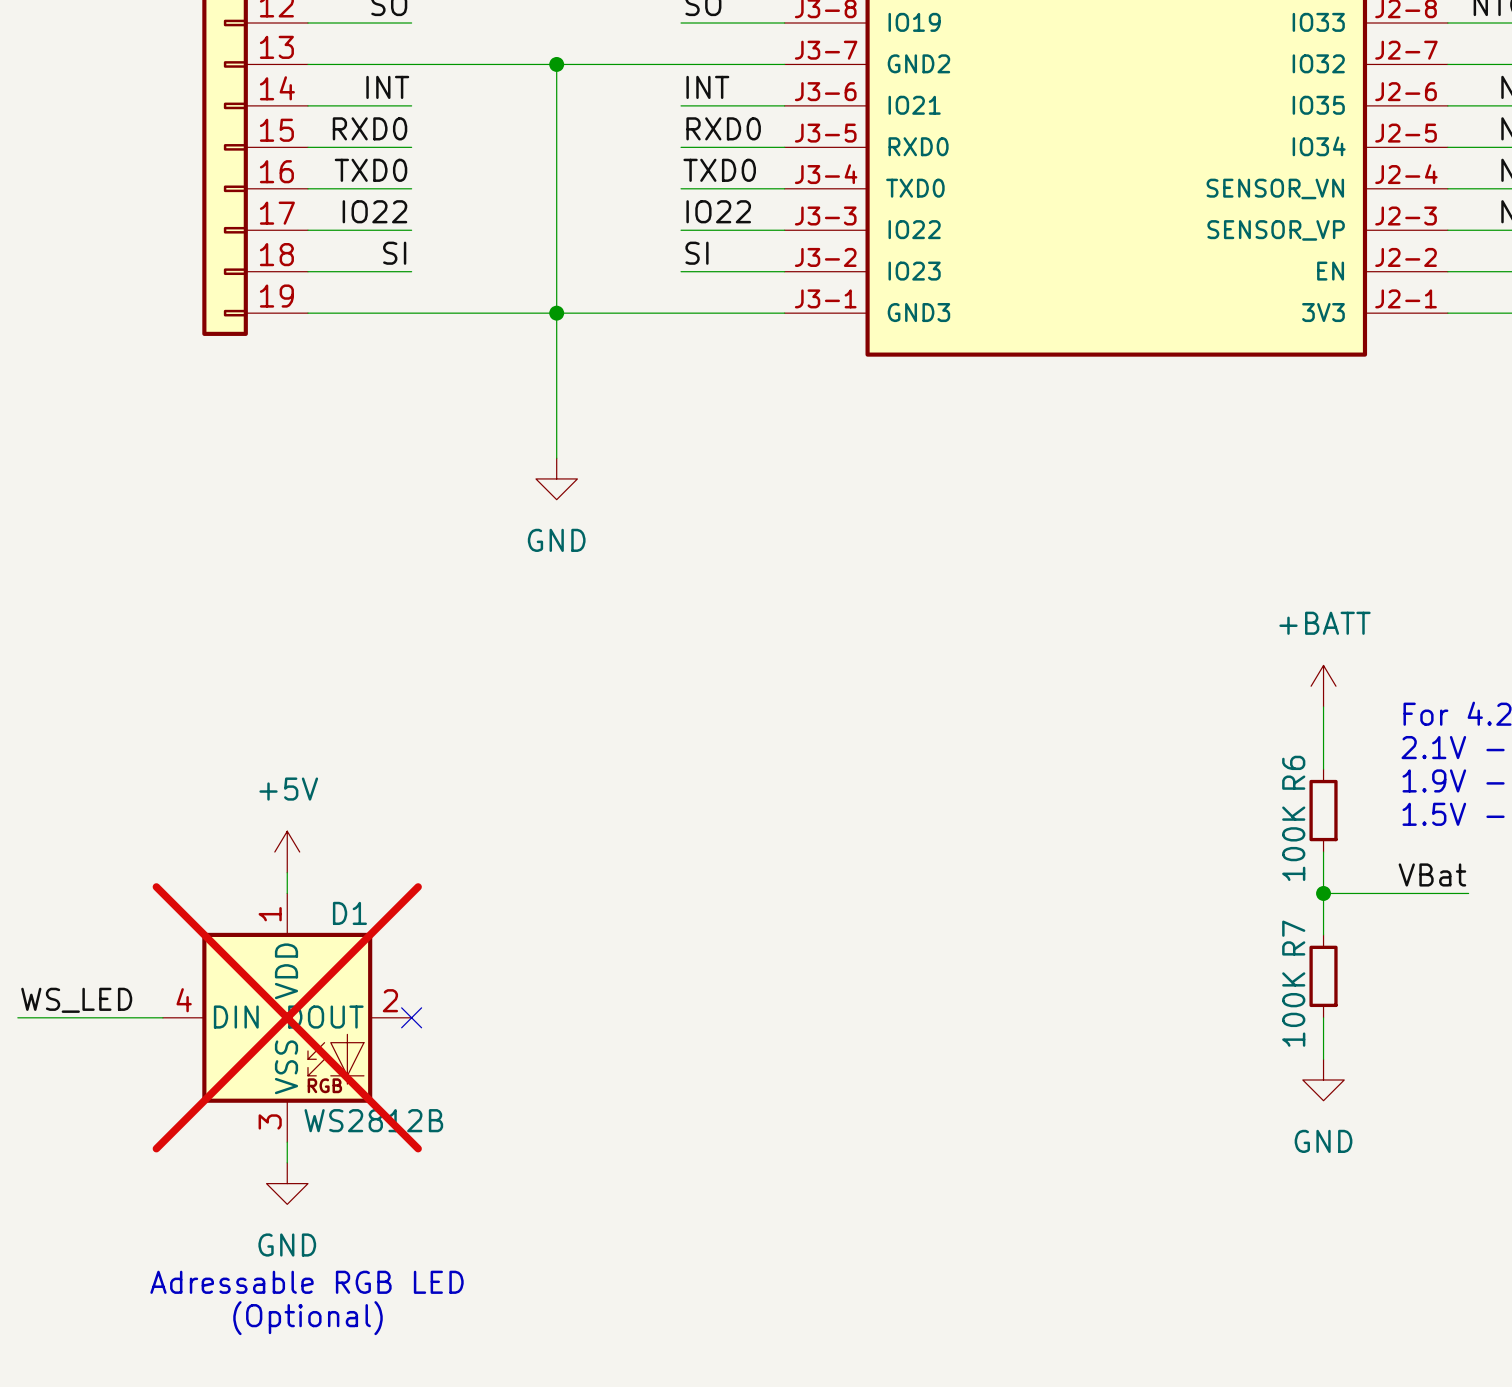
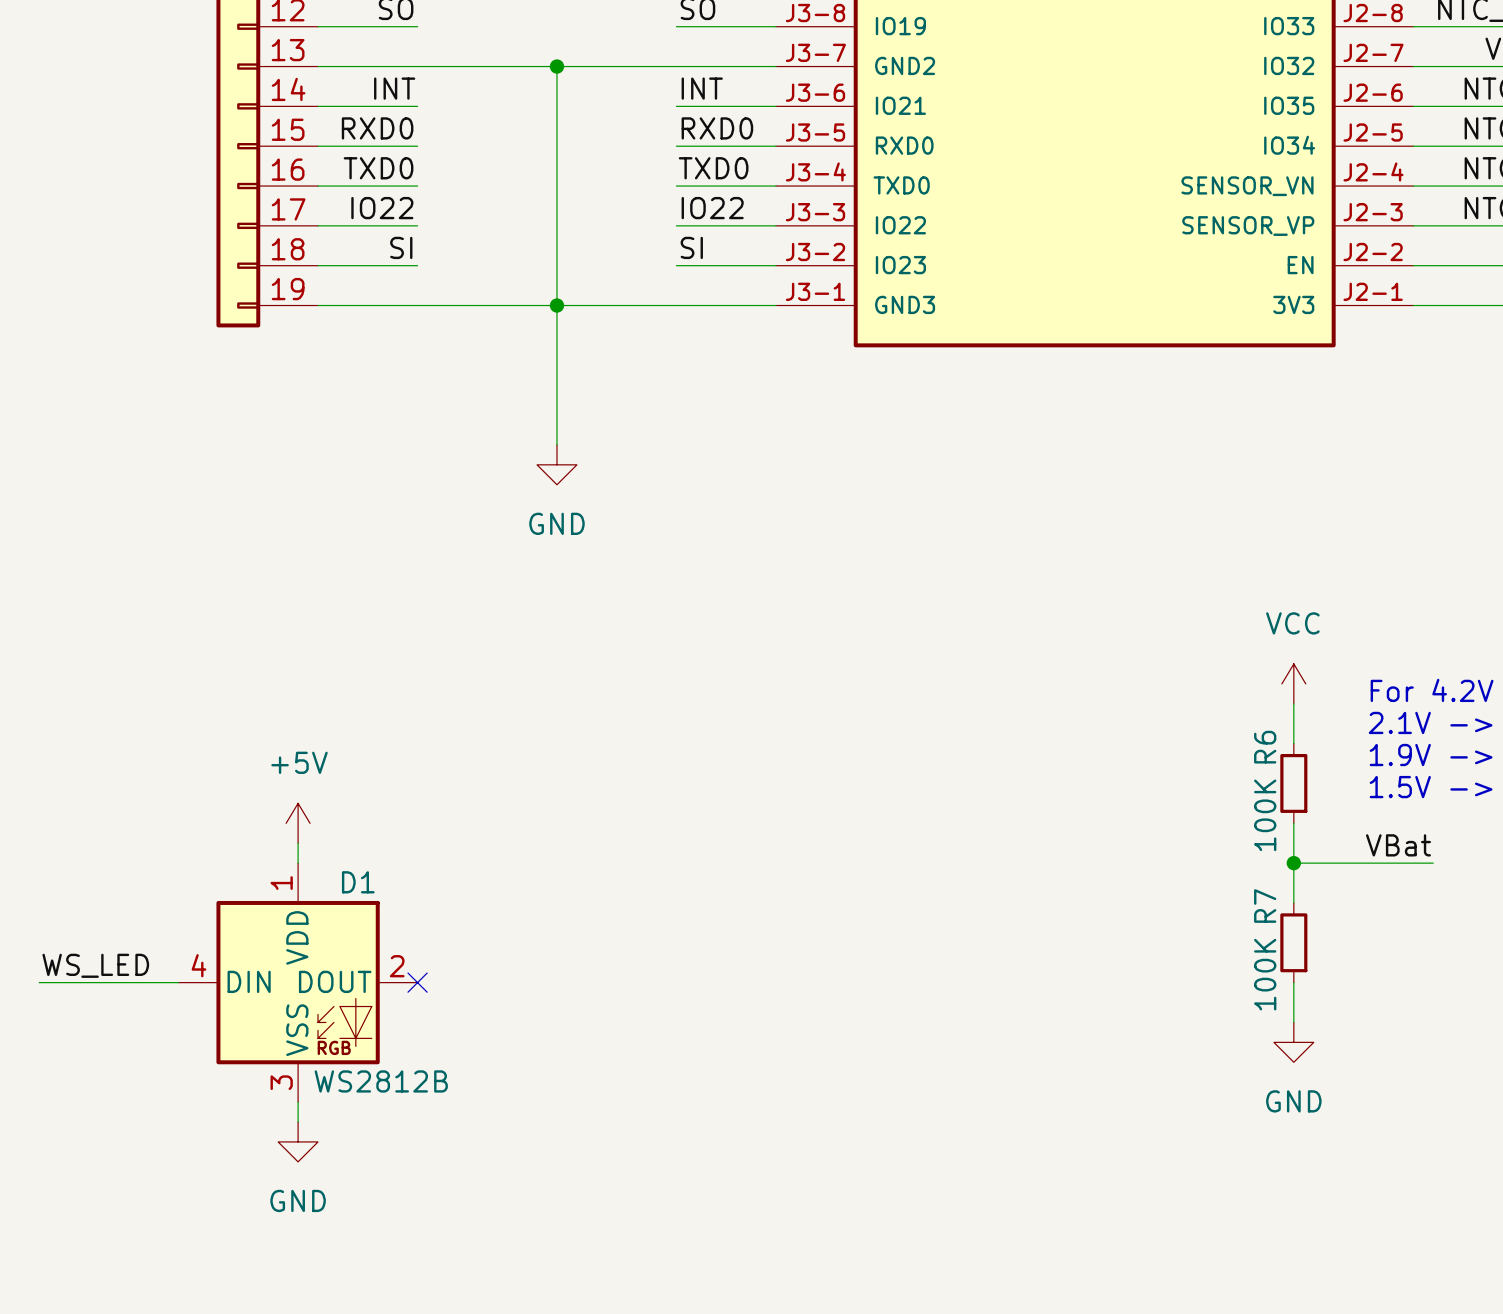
power symbol: +BATT (1323, 686) -> none
power symbol: none -> VCC (1293, 683)
D1 do-not-place cross: (287, 1017) -> none
text: Adressable RGB LED (307, 1282) -> none
text: (Optional) (307, 1318) -> none

